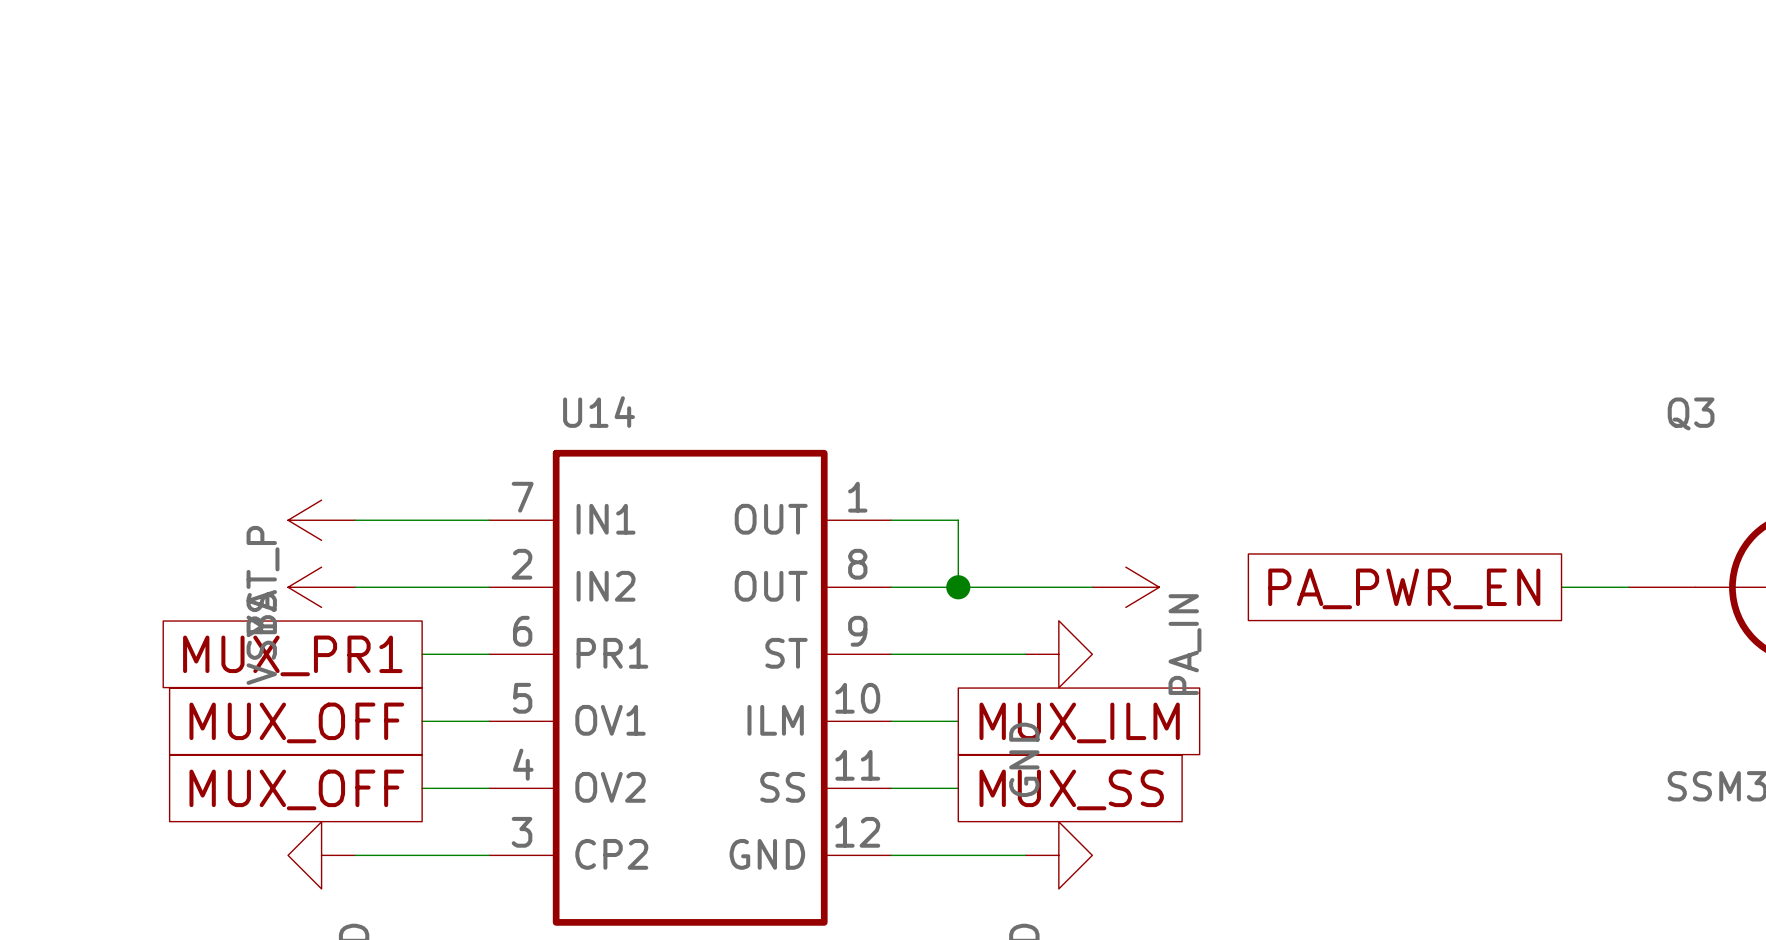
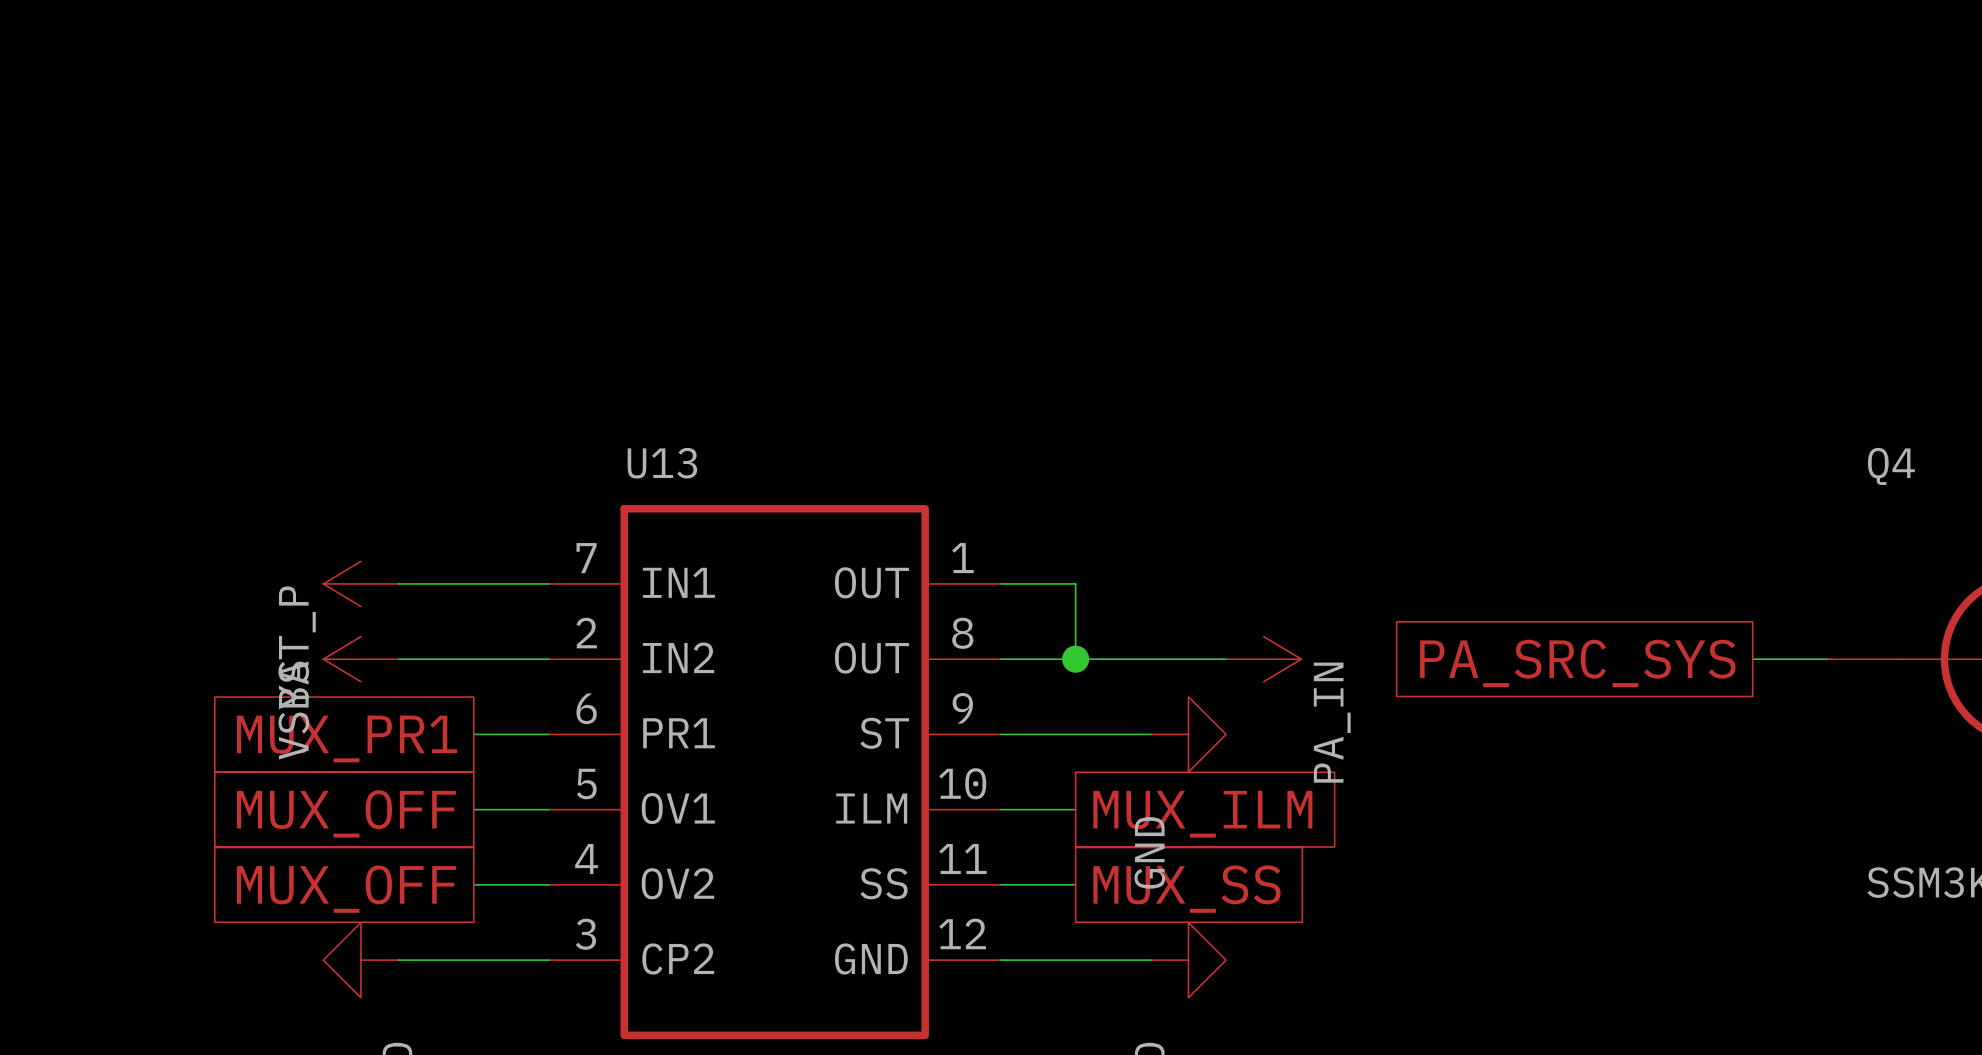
U14 name: U14 (599, 412) -> U13 (662, 463)
Q3 name: Q3 (1691, 413) -> Q4 (1891, 466)
global label: PA_PWR_EN (1404, 588) -> PA_SRC_SYS (1577, 663)

